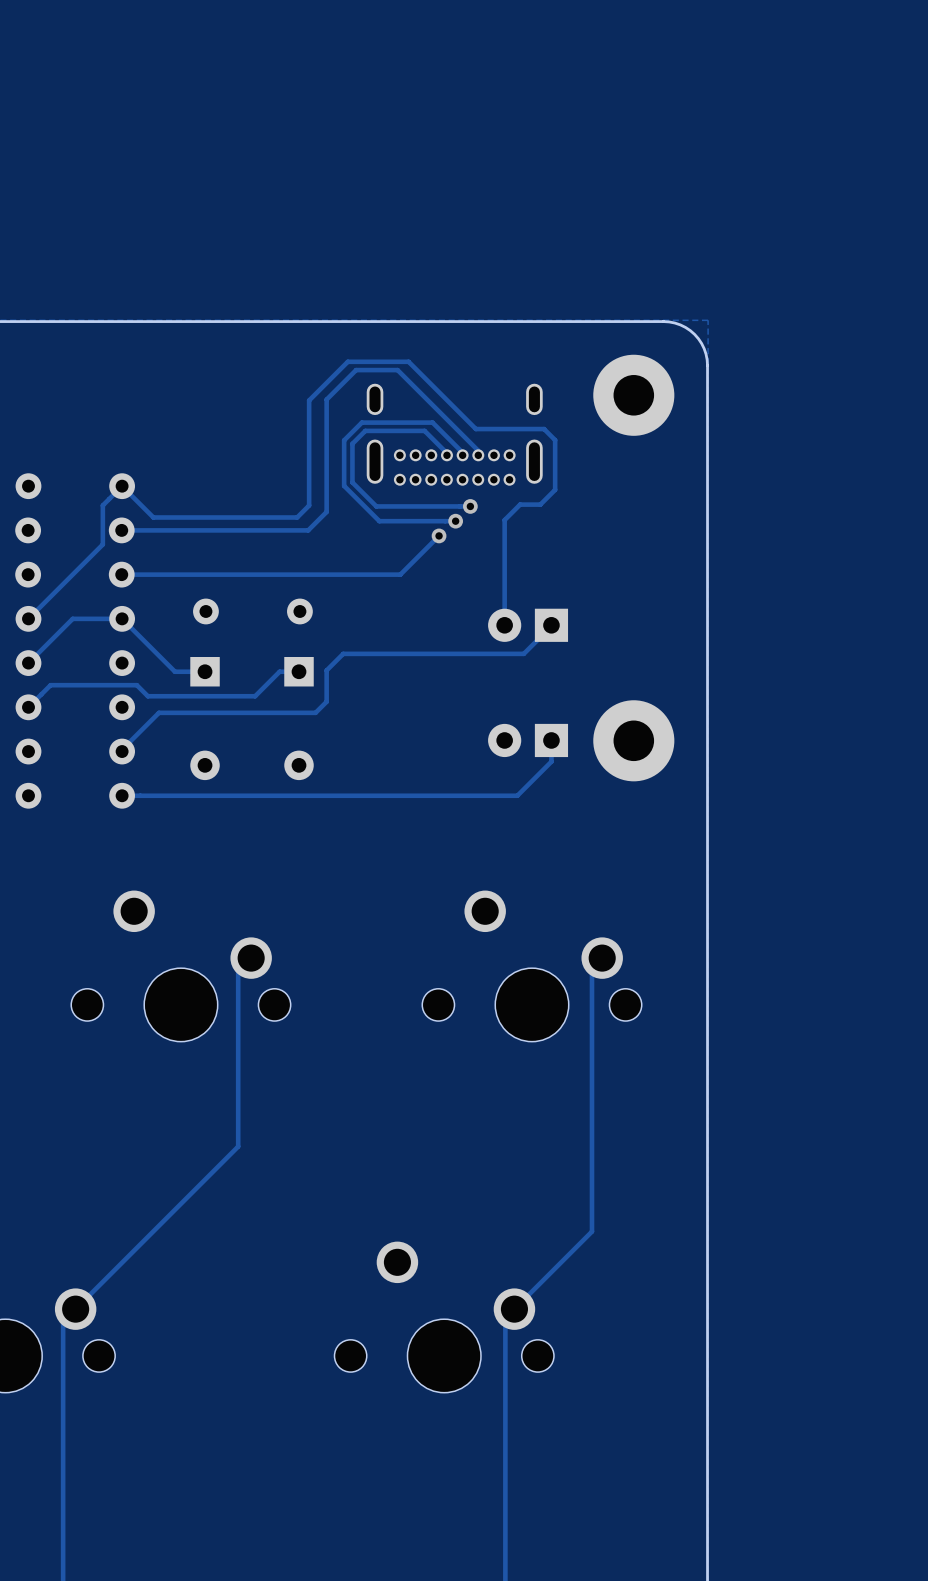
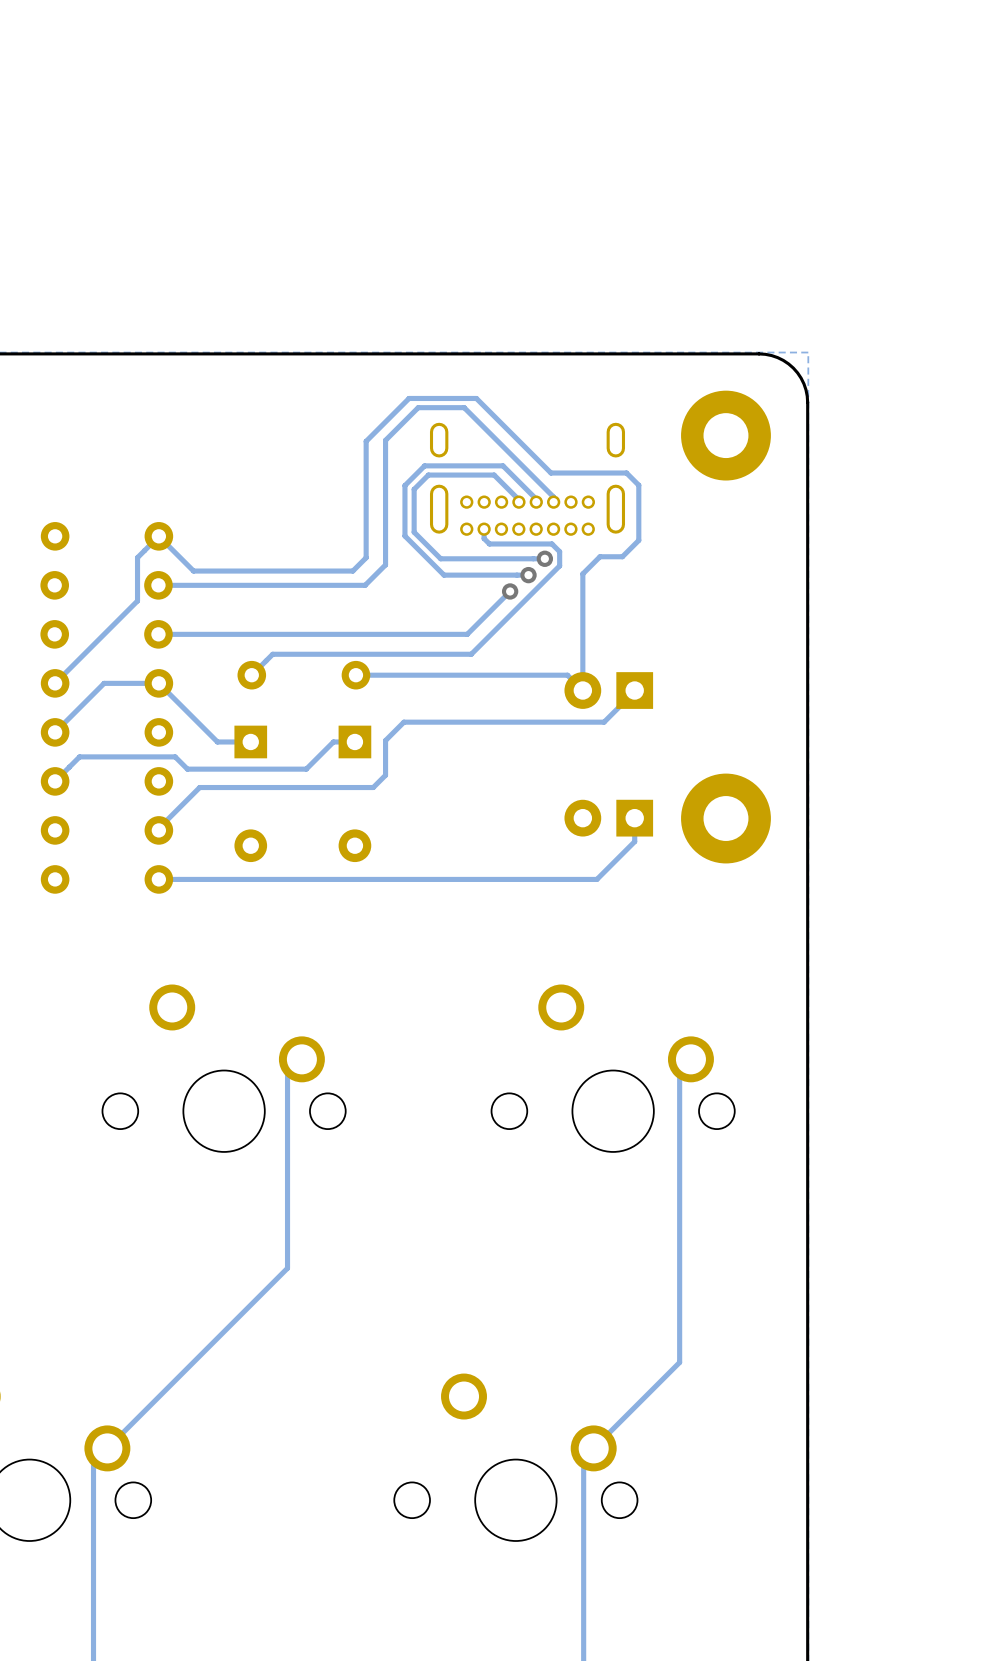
track: none -> (484, 529) (484, 538) (489, 543) (551, 543) (559, 551) (559, 565) (471, 654) (272, 654) (251, 675)
track: none -> (355, 675) (567, 675) (582, 690)

